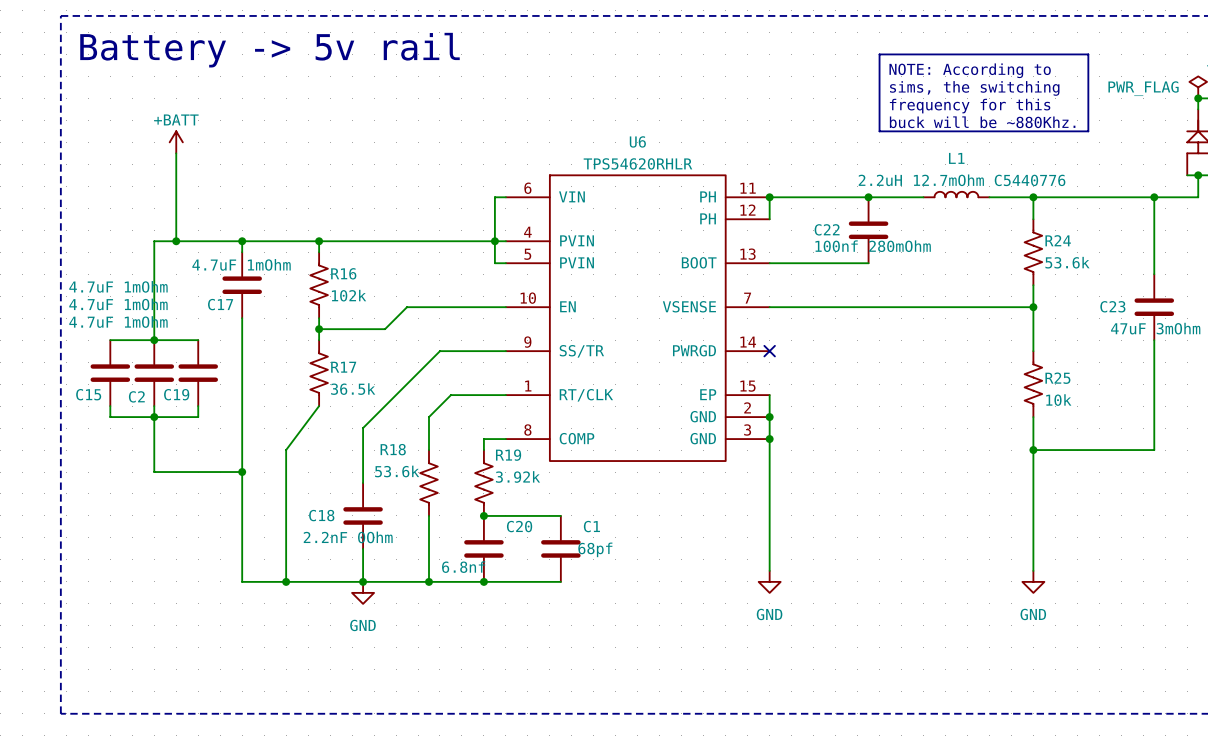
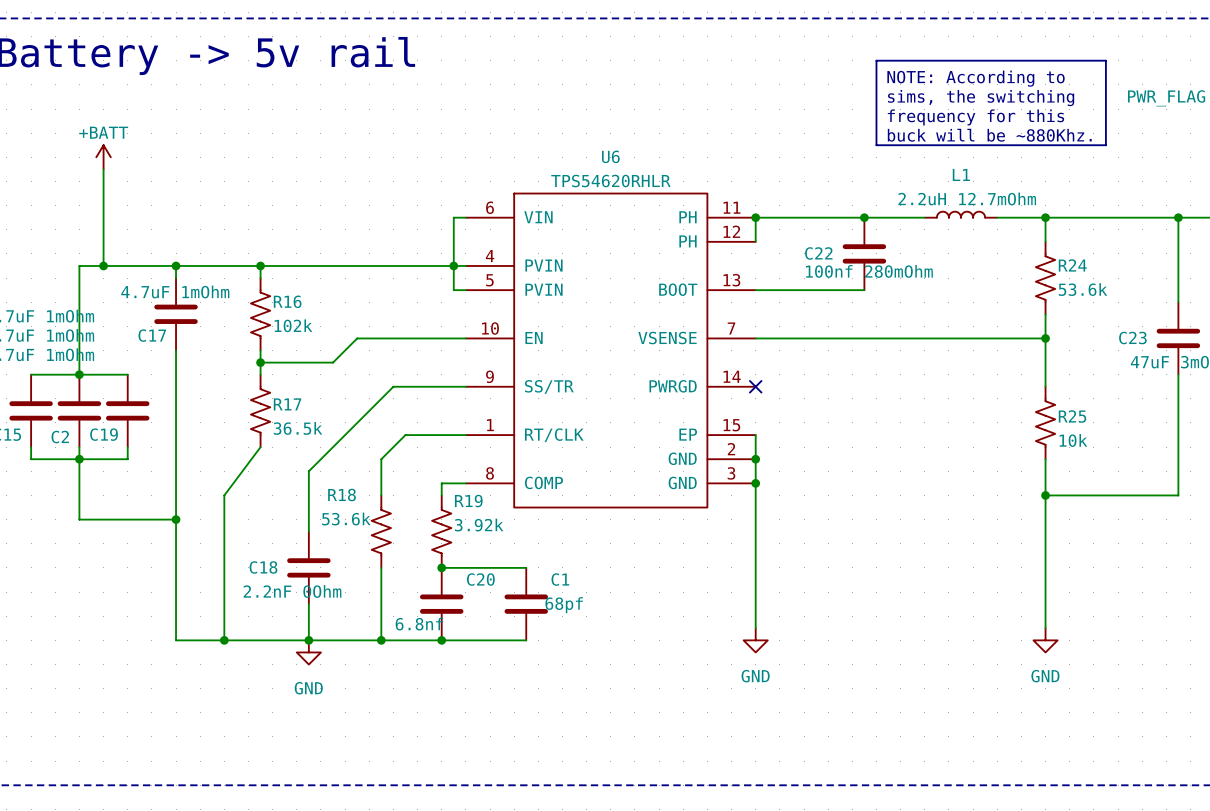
L1 value: 2.2uH 12.7mOhm C5440776 (962, 180) -> 2.2uH 12.7mOhm (967, 198)

